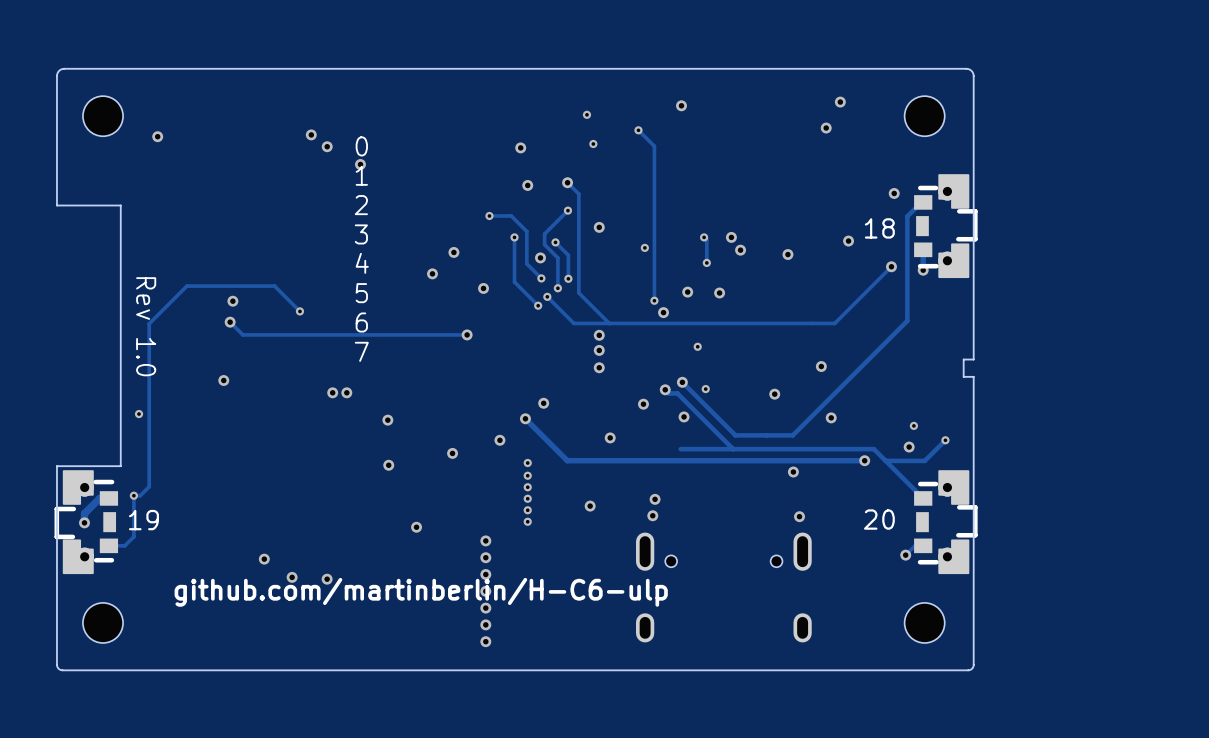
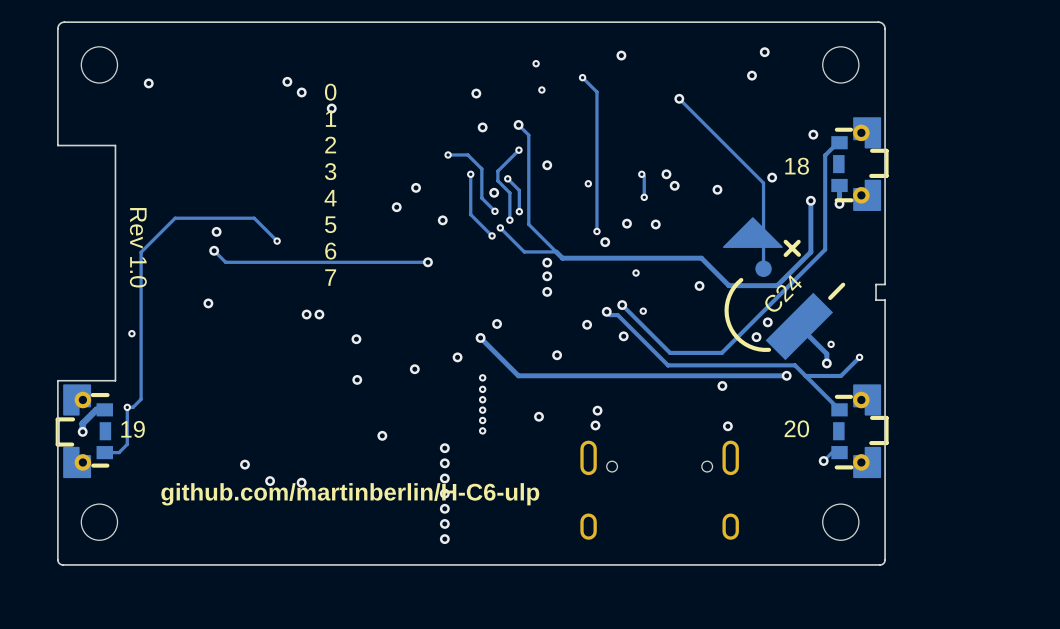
track: none -> (679, 98) (763, 183) (763, 268)
via: none -> (679, 98)
track: (891, 266) (834, 323) (609, 323) -> (810, 200) (810, 252) (777, 285) (728, 285) (701, 258) (562, 258) (556, 251)
via: none -> (699, 285)
C24: none -> (784, 288)
via: (821, 366) -> none
via: (774, 394) -> none
via: none -> (767, 322)
track: none -> (799, 326) (826, 353) (826, 363)
track: (733, 449) (680, 449) -> none

